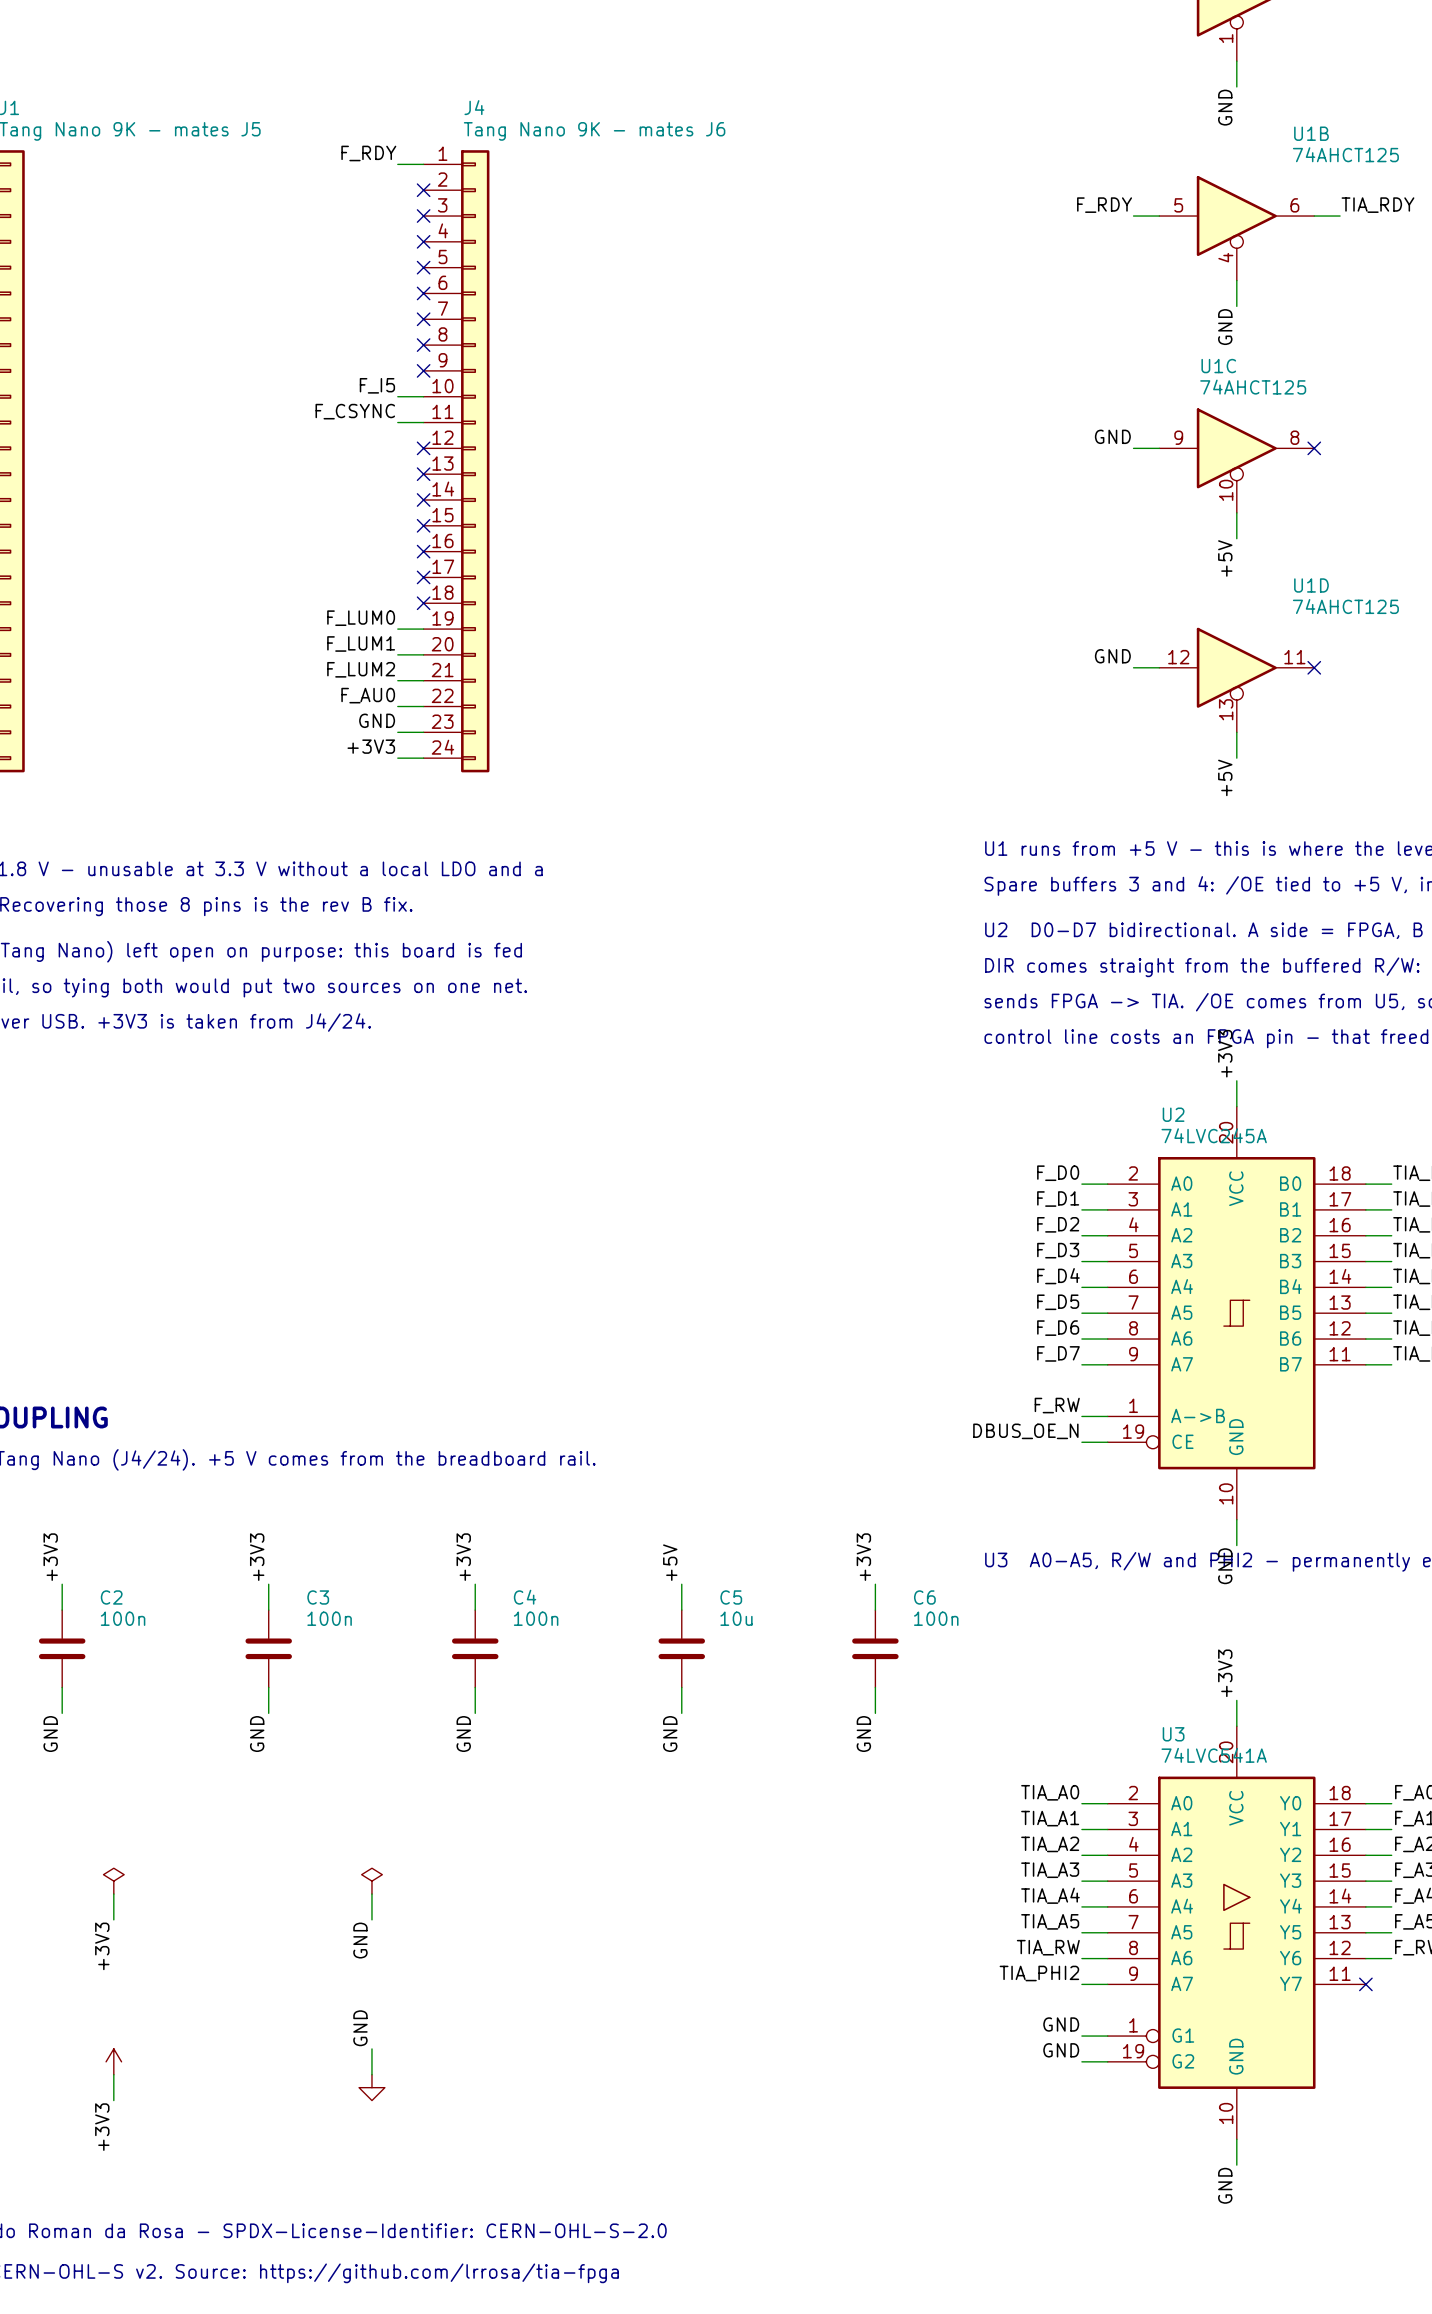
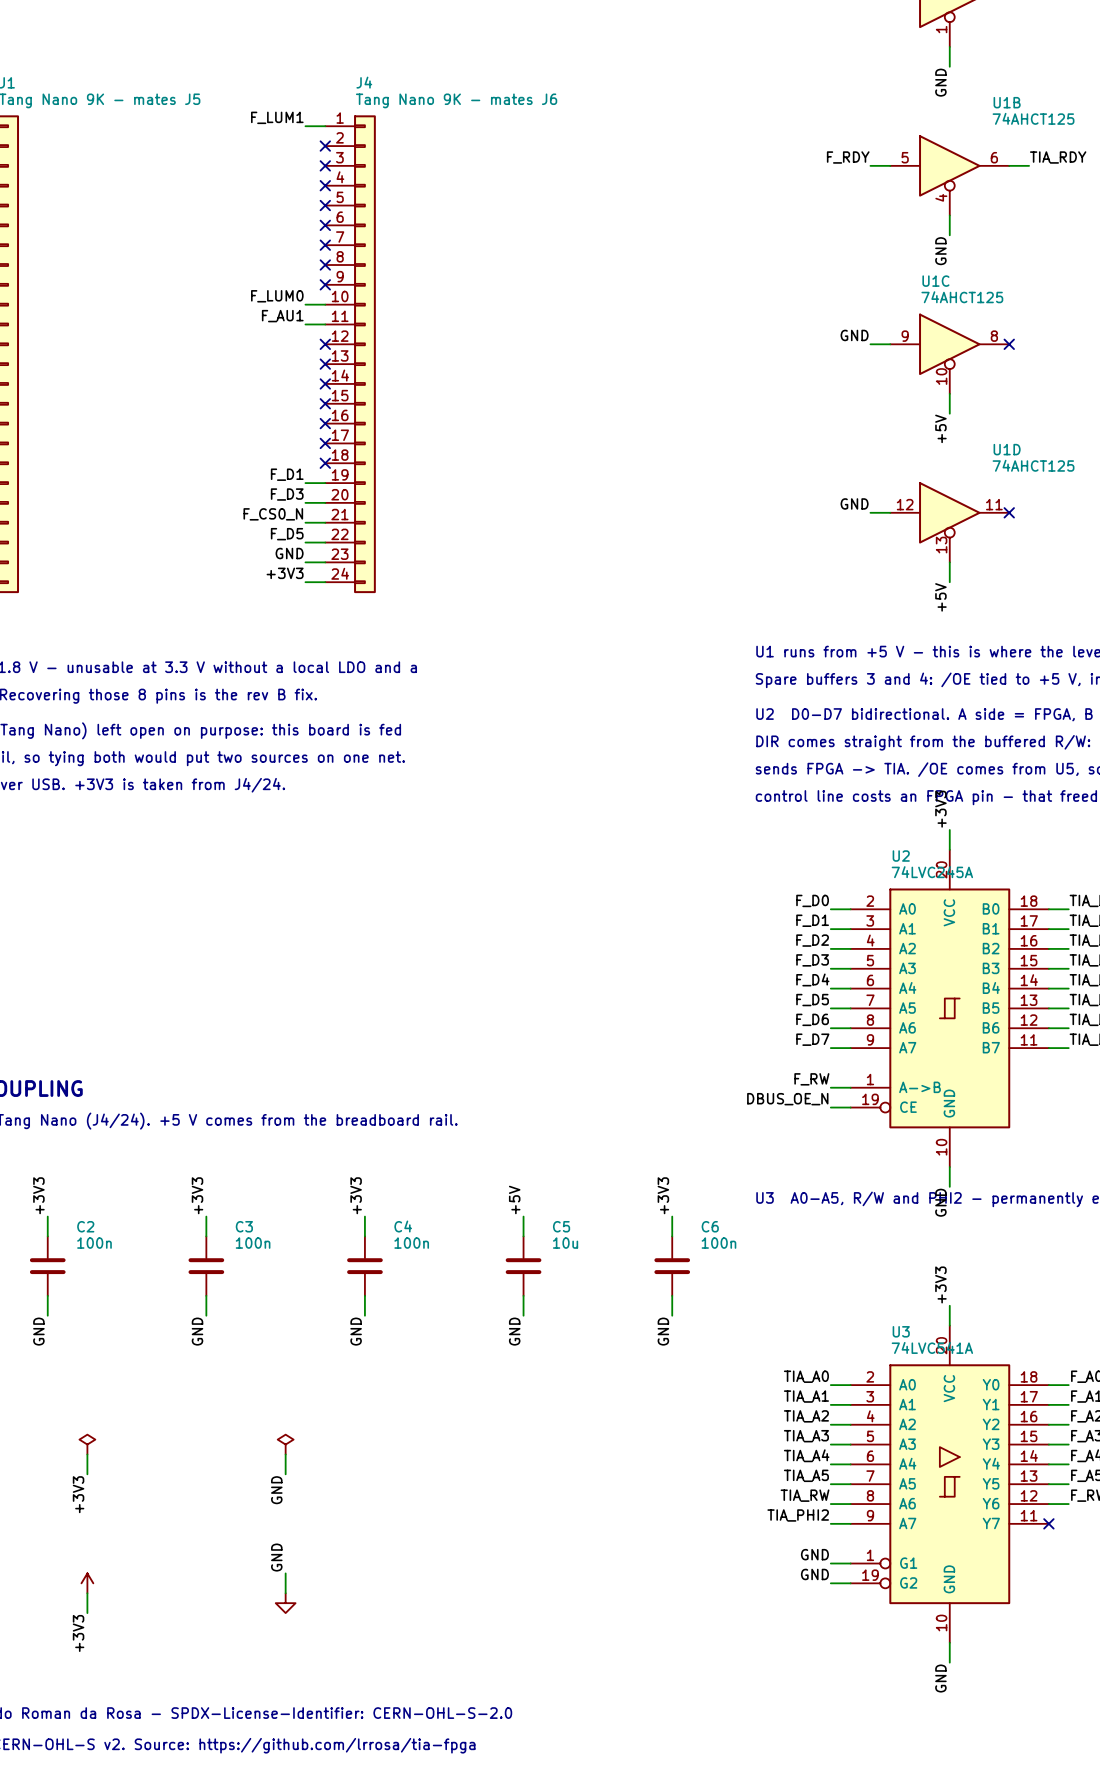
label: F_RDY (368, 153) -> F_LUM1 (277, 117)
label: F_I5 (377, 385) -> F_LUM0 (277, 296)
label: F_CSYNC (355, 411) -> F_AU1 (282, 316)
label: F_LUM0 (361, 618) -> F_D1 (287, 474)
label: F_LUM1 (361, 643) -> F_D3 (287, 494)
label: F_LUM2 (361, 669) -> F_CS0_N (273, 514)
label: F_AU0 (368, 695) -> F_D5 (287, 534)

